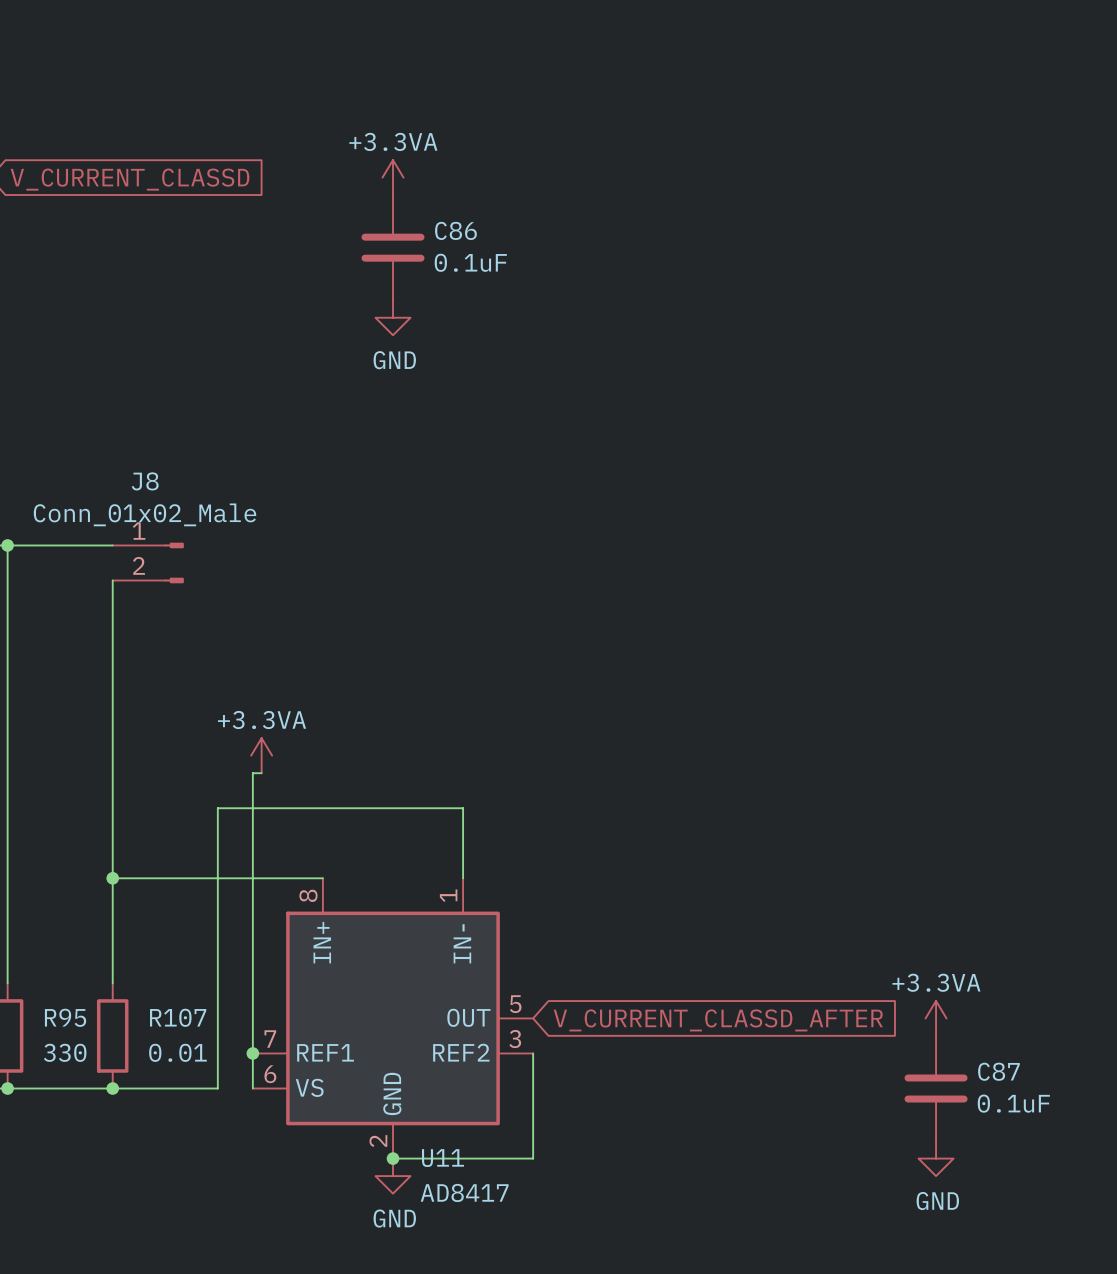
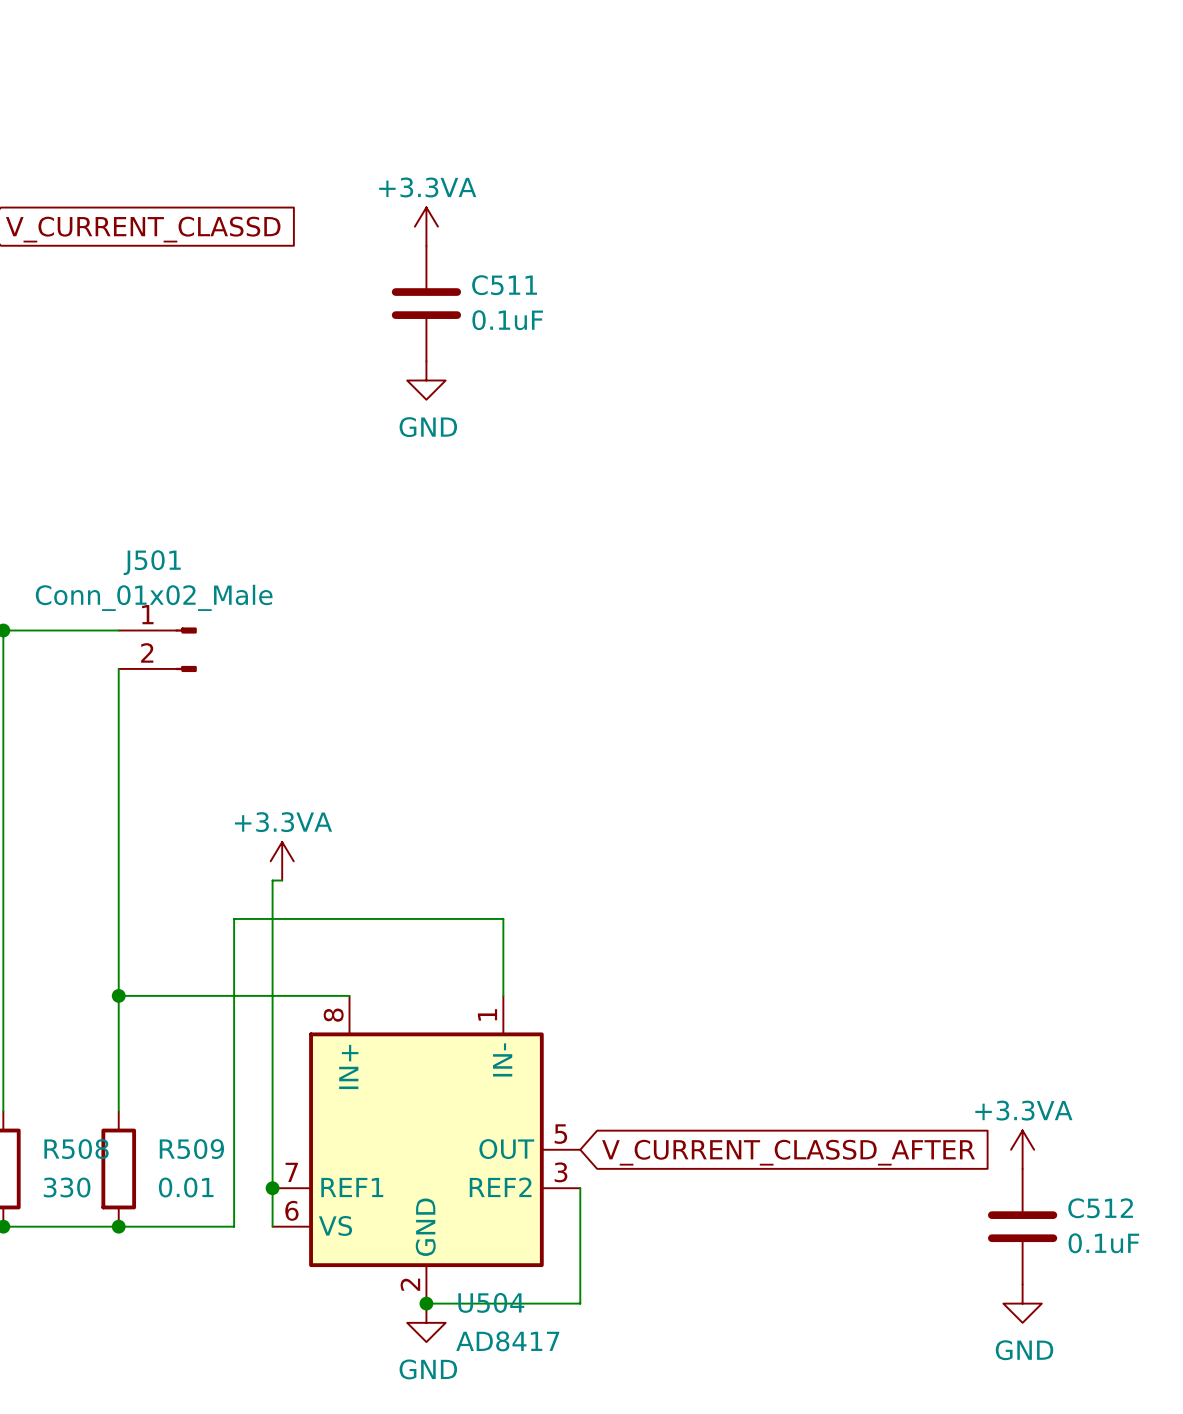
C86 name: C86 (455, 230) -> C511 (504, 285)
J8 name: J8 (145, 481) -> J501 (152, 562)
R95 name: R95 (65, 1017) -> R508 (76, 1149)
R107 name: R107 (178, 1017) -> R509 (191, 1149)
C87 name: C87 (998, 1071) -> C512 (1100, 1208)
U11 name: U11 (442, 1158) -> U504 (491, 1302)

